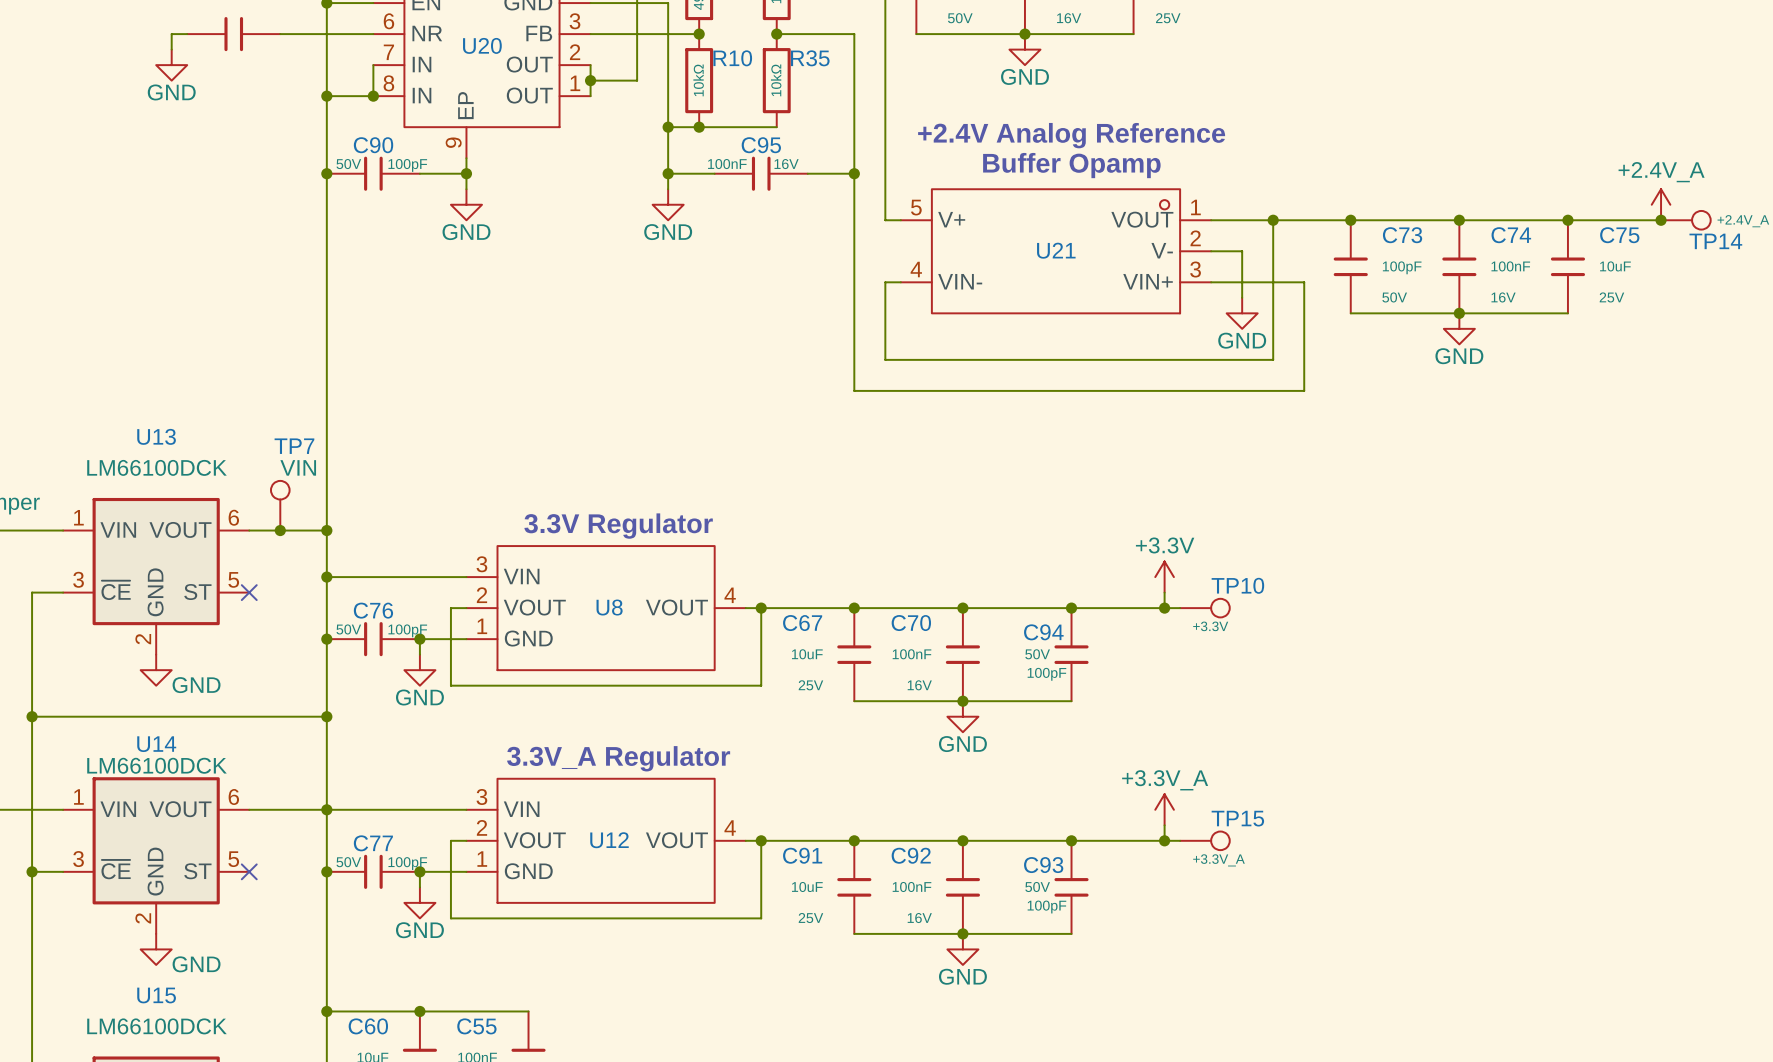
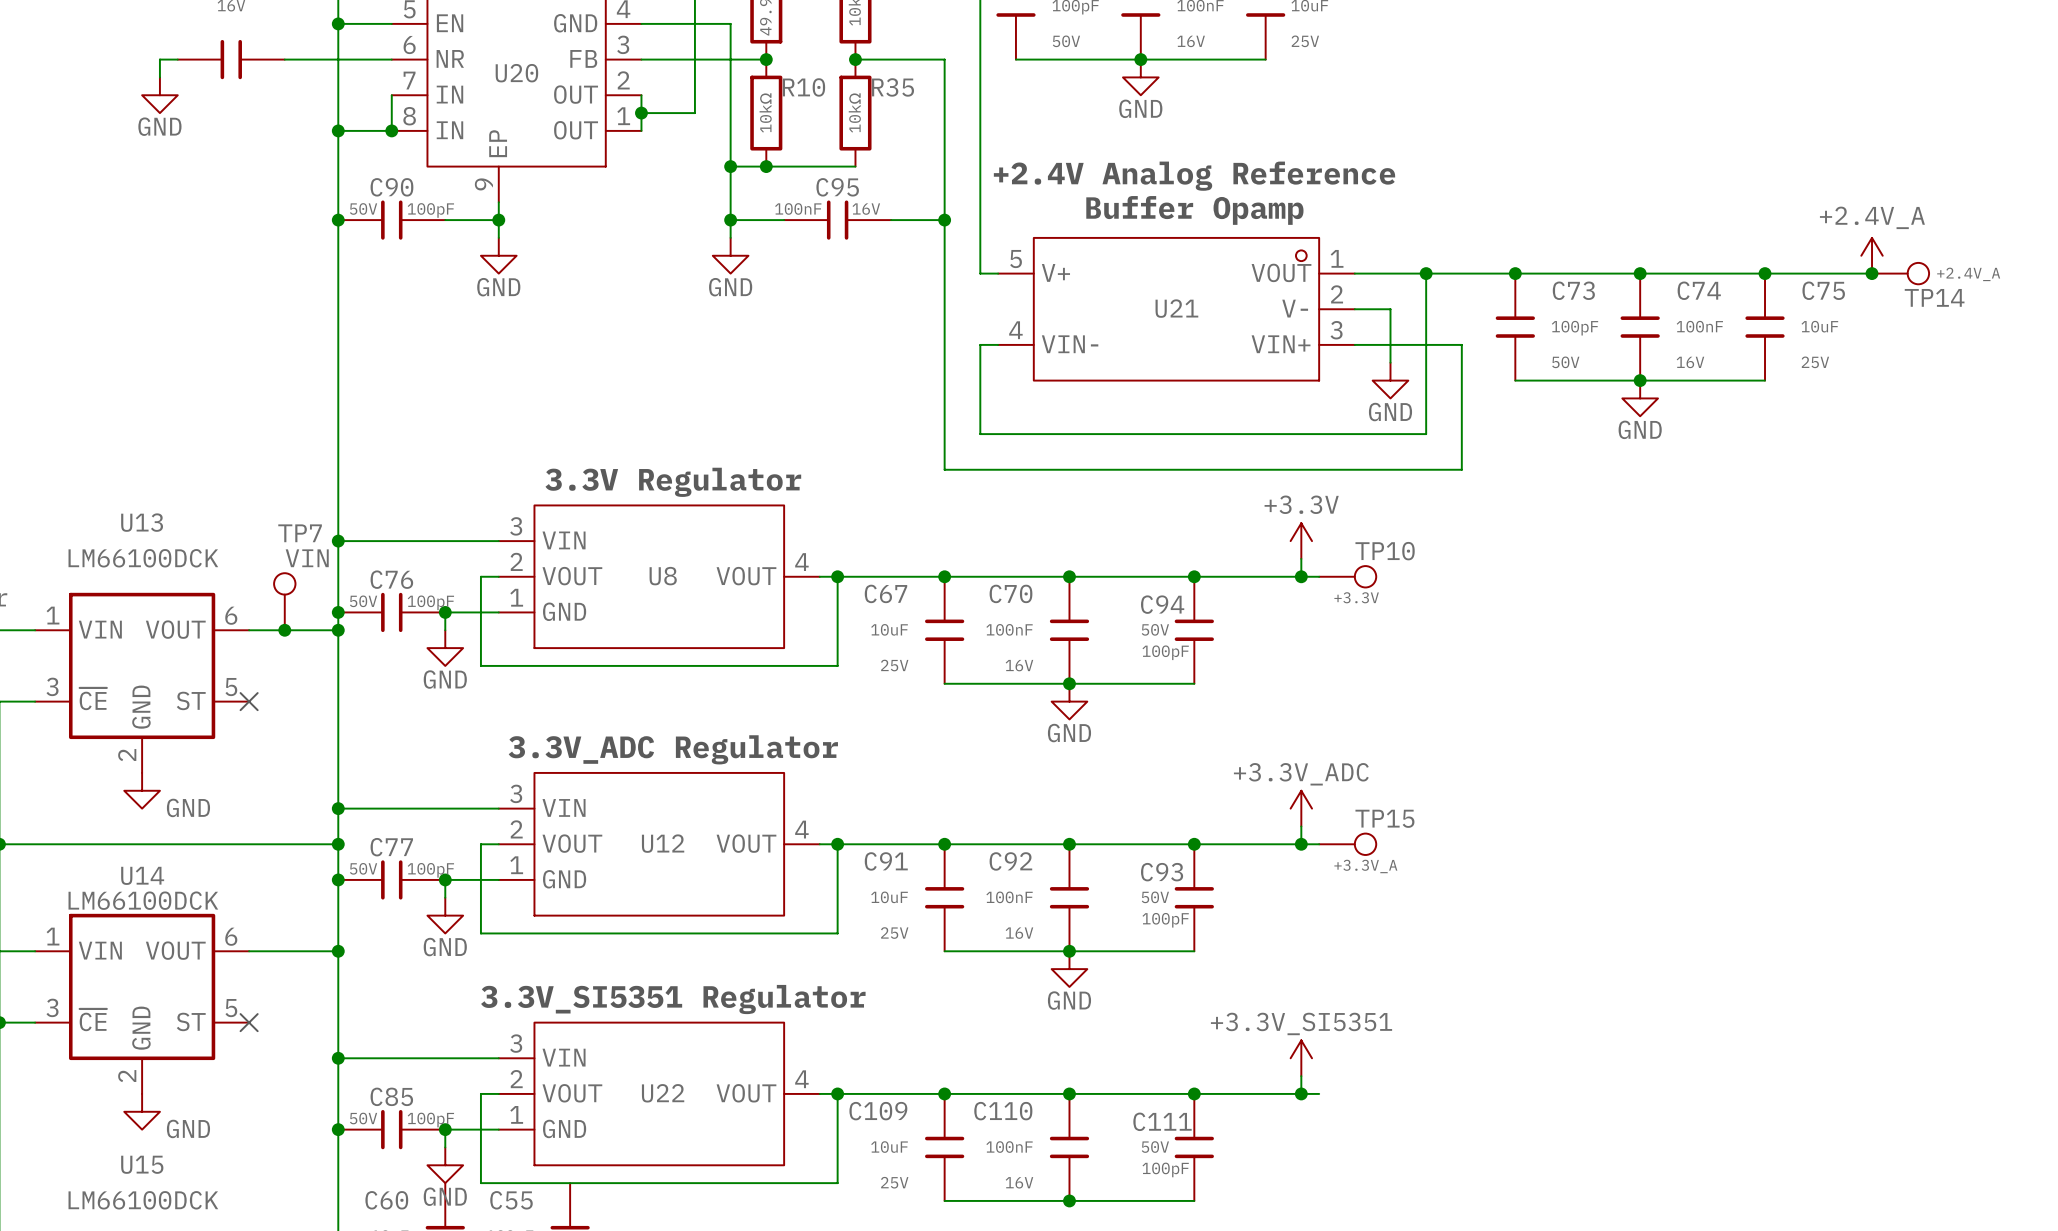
junction: none -> (338, 541)
wire: none -> (498, 576) (480, 576) (480, 665) (837, 665) (837, 576)
junction: none -> (837, 576)
junction: none -> (944, 576)
junction: none -> (1069, 576)
junction: none -> (1194, 576)
junction: none -> (1301, 576)
junction: none -> (338, 612)
junction: none -> (445, 612)
text position: 3.3V Regulator (618, 526) -> 3.3V Regulator (673, 482)
power symbol: none -> GND (445, 648)
wire: (326, 577) (466, 577) -> (338, 541) (498, 541)
junction: (326, 577) -> none
power symbol position: +3.3V (1164, 577) -> +3.3V (1301, 541)
power symbol: none -> GND (1069, 701)
wire: (1164, 592) (1164, 608) -> (1301, 558) (1301, 576)
wire: (466, 608) (450, 608) (450, 685) -> (338, 808) (480, 808)
U8 position: (606, 608) -> (659, 576)
wire: (745, 608) (1180, 608) -> (819, 576) (1319, 576)
wire: (761, 608) (761, 685) (466, 685) -> none
junction: (761, 608) -> none
junction: (854, 608) -> none
junction position: (962, 608) -> (1069, 683)
junction: (1071, 608) -> none
junction: (1164, 608) -> none
TP10 position: (1204, 608) -> (1347, 576)
text: none -> 3.3V_ADC Regulator (673, 749)
junction position: (326, 639) -> (338, 808)
C76 position: (373, 639) -> (391, 612)
junction: (419, 639) -> none
wire: (466, 639) (419, 639) (419, 654) -> (498, 612) (445, 612) (445, 630)
C67 position: (854, 654) -> (944, 630)
C70 position: (962, 654) -> (1069, 630)
C94 position: (1071, 654) -> (1194, 630)
power symbol: GND (419, 670) -> none
power symbol: none -> +3.3V_ADC (1301, 808)
wire: (854, 701) (1071, 701) -> (944, 683) (1194, 683)
junction position: (962, 701) -> (1069, 844)
junction: none -> (837, 844)
junction: none -> (944, 844)
power symbol: GND (962, 716) -> none
junction: none -> (1194, 844)
junction: none -> (1301, 844)
junction: none -> (338, 879)
junction: none -> (445, 879)
text: 3.3V_A Regulator (618, 758) -> none
power symbol: none -> GND (445, 915)
wire: (326, 809) (466, 809) -> (338, 1058) (498, 1058)
wire: none -> (944, 951) (1194, 951)
power symbol: +3.3V_A (1164, 809) -> none
power symbol: none -> GND (1069, 969)
wire: (1164, 825) (1164, 840) -> (1301, 826) (1301, 844)
wire: (466, 840) (450, 840) (450, 918) (761, 918) (761, 840) -> (498, 844) (480, 844) (480, 933) (837, 933) (837, 844)
U12 position: (606, 840) -> (659, 844)
wire: (745, 840) (1180, 840) -> (819, 844) (1319, 844)
junction: (761, 840) -> none
junction: (854, 840) -> none
junction position: (962, 840) -> (1069, 951)
junction: (1071, 840) -> none
junction: (1164, 840) -> none
TP15 position: (1204, 840) -> (1347, 844)
text: none -> 3.3V_SI5351 Regulator (673, 999)
junction position: (326, 871) -> (338, 1058)
C77 position: (373, 871) -> (391, 879)
junction: (419, 871) -> none
wire: (466, 871) (419, 871) (419, 887) -> (498, 879) (445, 879) (445, 897)
C91 position: (854, 887) -> (944, 897)
C92 position: (962, 887) -> (1069, 897)
C93 position: (1071, 887) -> (1194, 897)
power symbol: GND (419, 902) -> none
power symbol: none -> +3.3V_SI5351 (1301, 1058)
wire: none -> (1301, 1076) (1301, 1093)
U22: none -> (659, 1093)
wire: none -> (819, 1093) (944, 1093)
wire: none -> (837, 1093) (837, 1183) (570, 1183)
junction: none -> (837, 1093)
junction: none -> (944, 1093)
wire: none -> (1194, 1093) (1319, 1093)
junction: none -> (1194, 1093)
junction: none -> (1301, 1093)
power symbol: GND (962, 949) -> none
junction: none -> (338, 1129)
C85: none -> 100pF (391, 1129)
junction: none -> (445, 1129)
wire: none -> (498, 1129) (445, 1129) (445, 1147)
C109: none -> 10uF (944, 1147)
C110: none -> 100nF (1069, 1147)
C111: none -> 100pF (1194, 1147)
power symbol: none -> GND (445, 1165)
wire: (326, 1011) (450, 1011) -> (498, 1093) (480, 1093) (480, 1183)
junction: (326, 1011) -> none
junction: (419, 1011) -> none
wire: none -> (944, 1200) (1194, 1200)
junction: none -> (1069, 1200)

